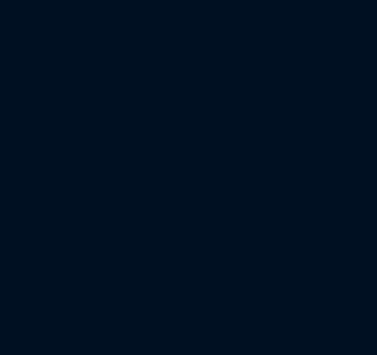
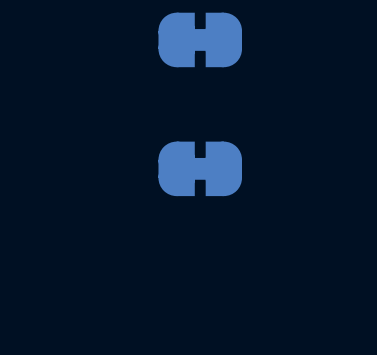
part: none -> (200, 39)
part: none -> (200, 168)

